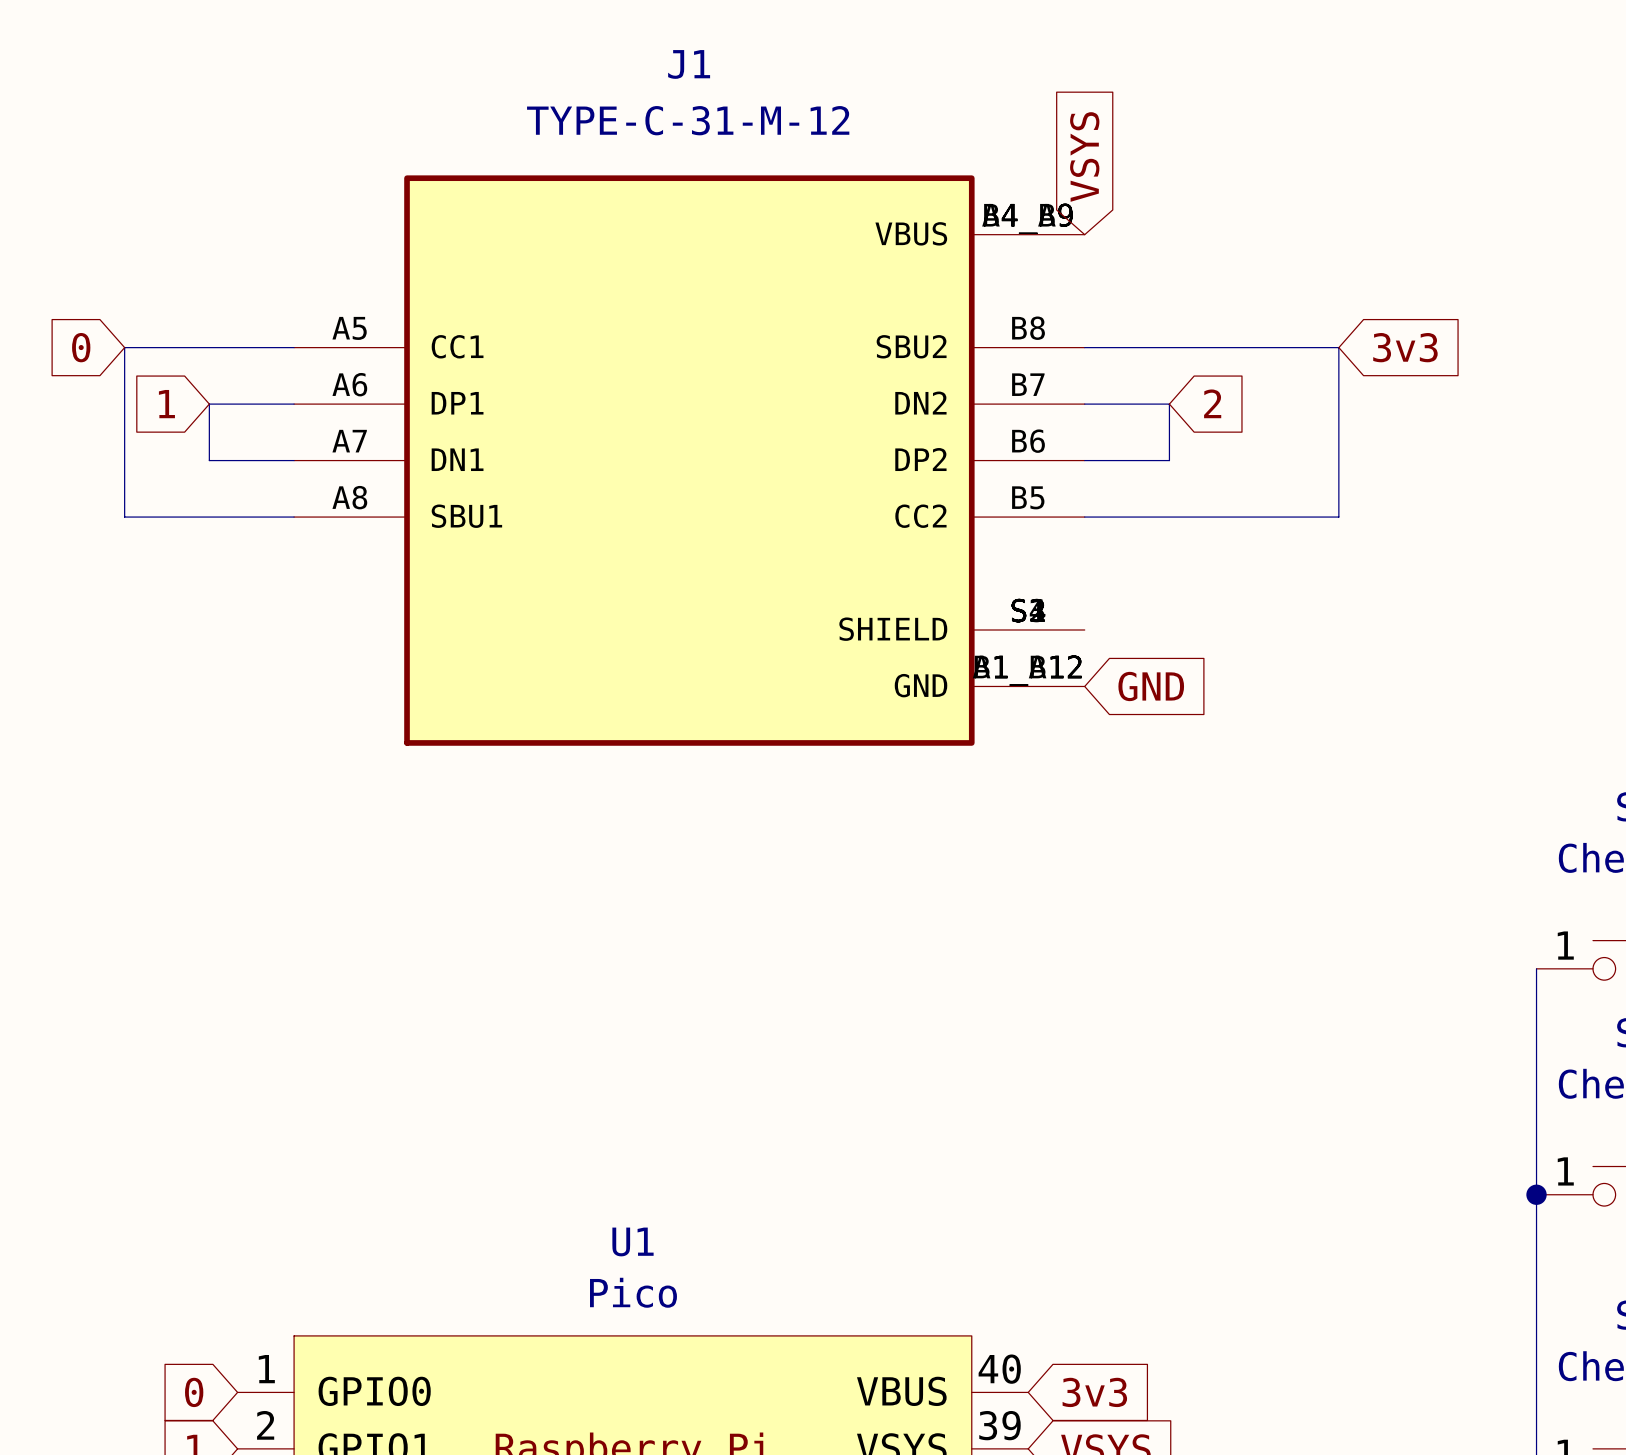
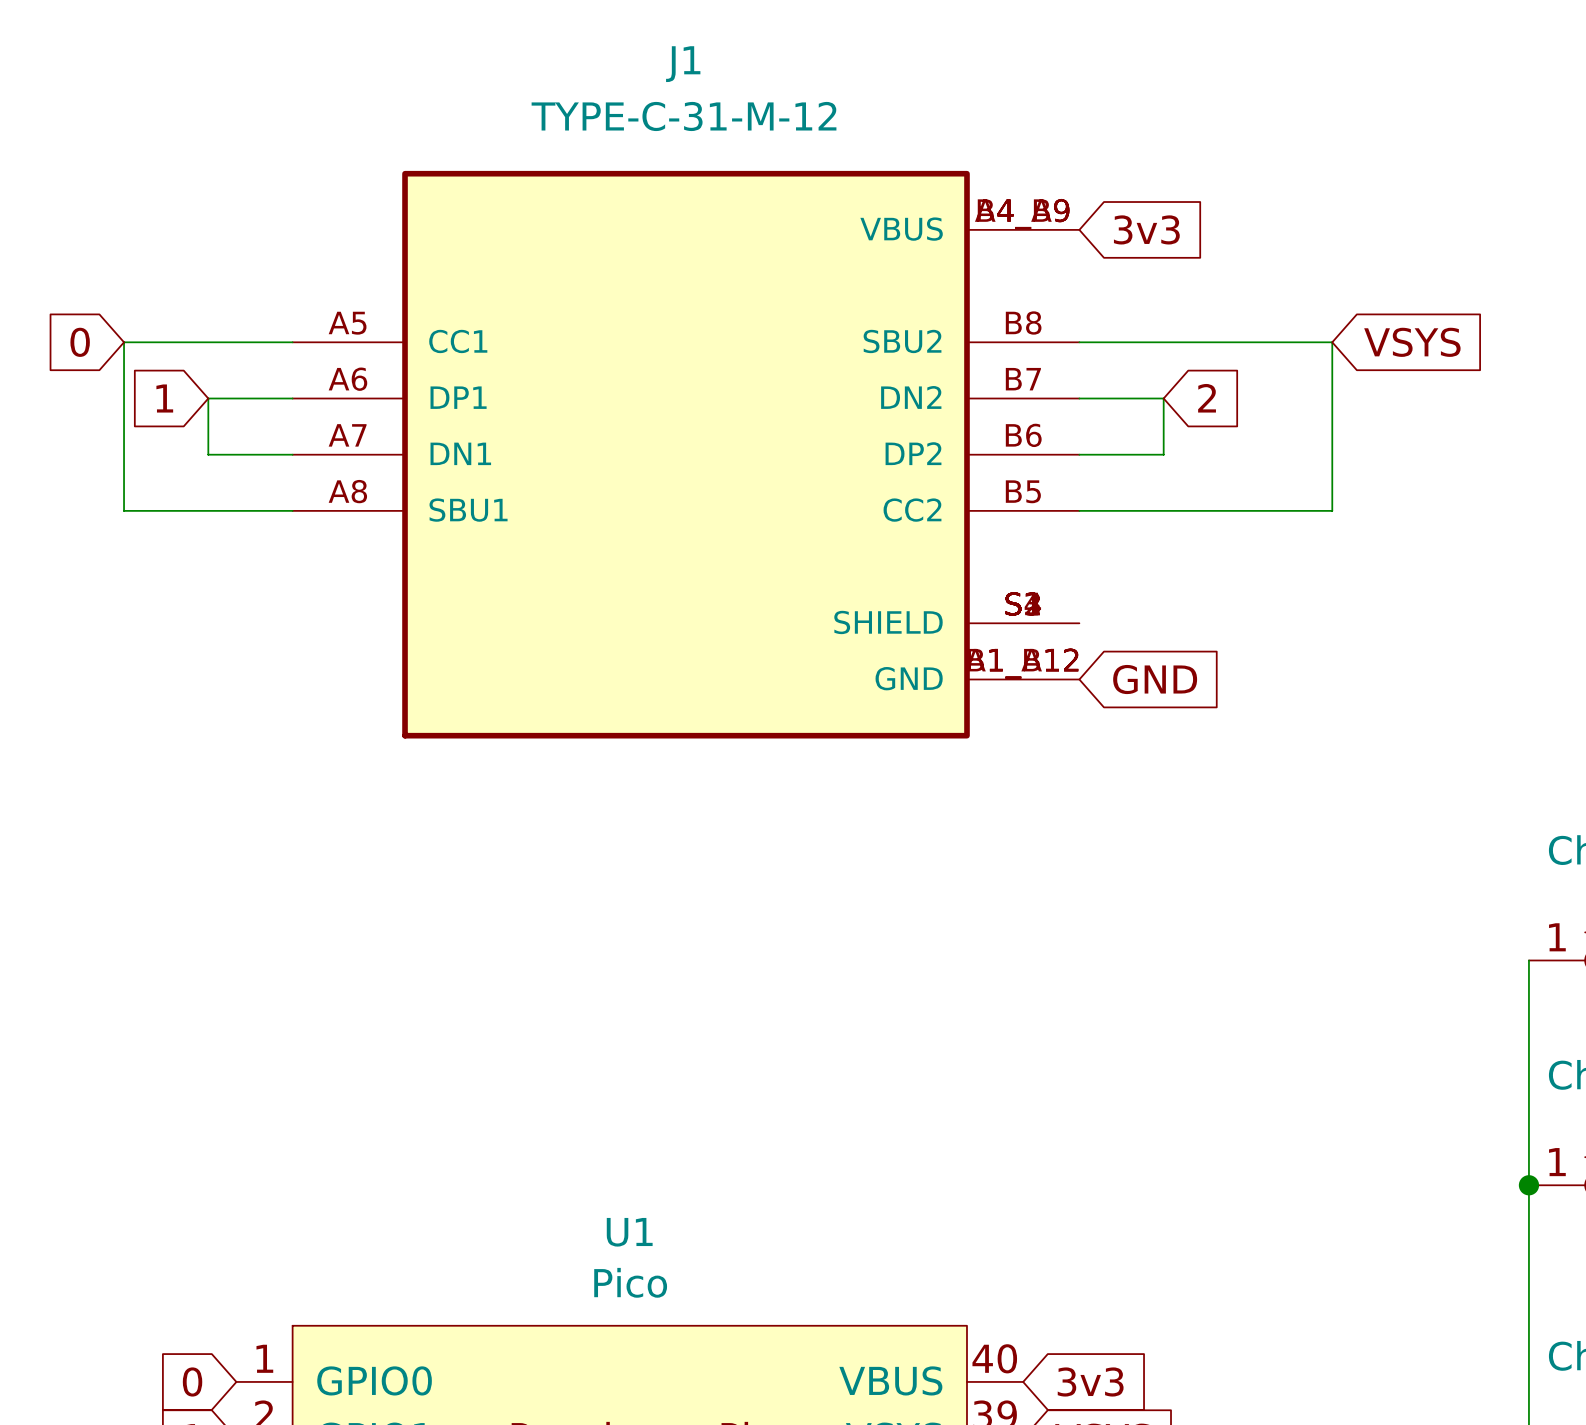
global label: VSYS (1084, 157) -> 3v3 (1146, 229)
global label: 3v3 (1405, 347) -> VSYS (1412, 342)

